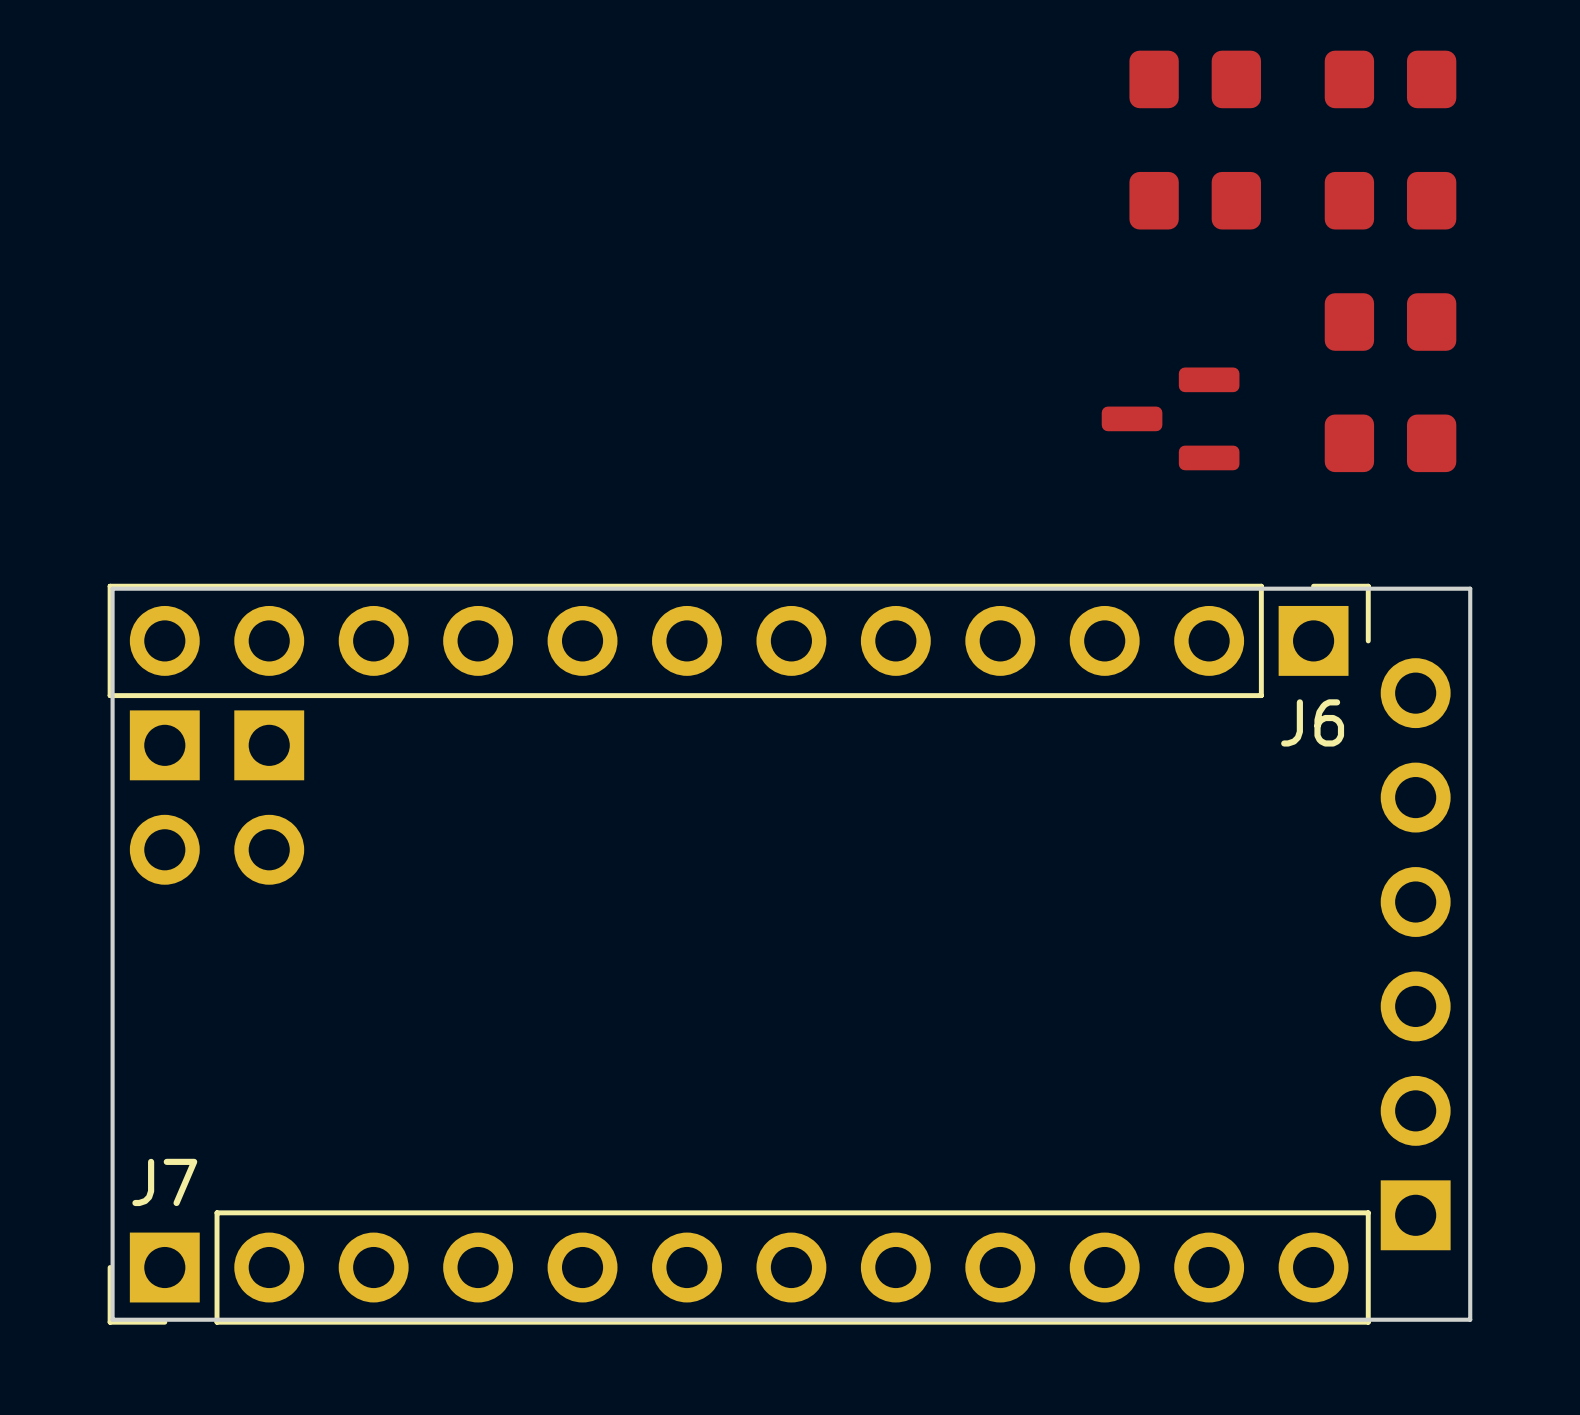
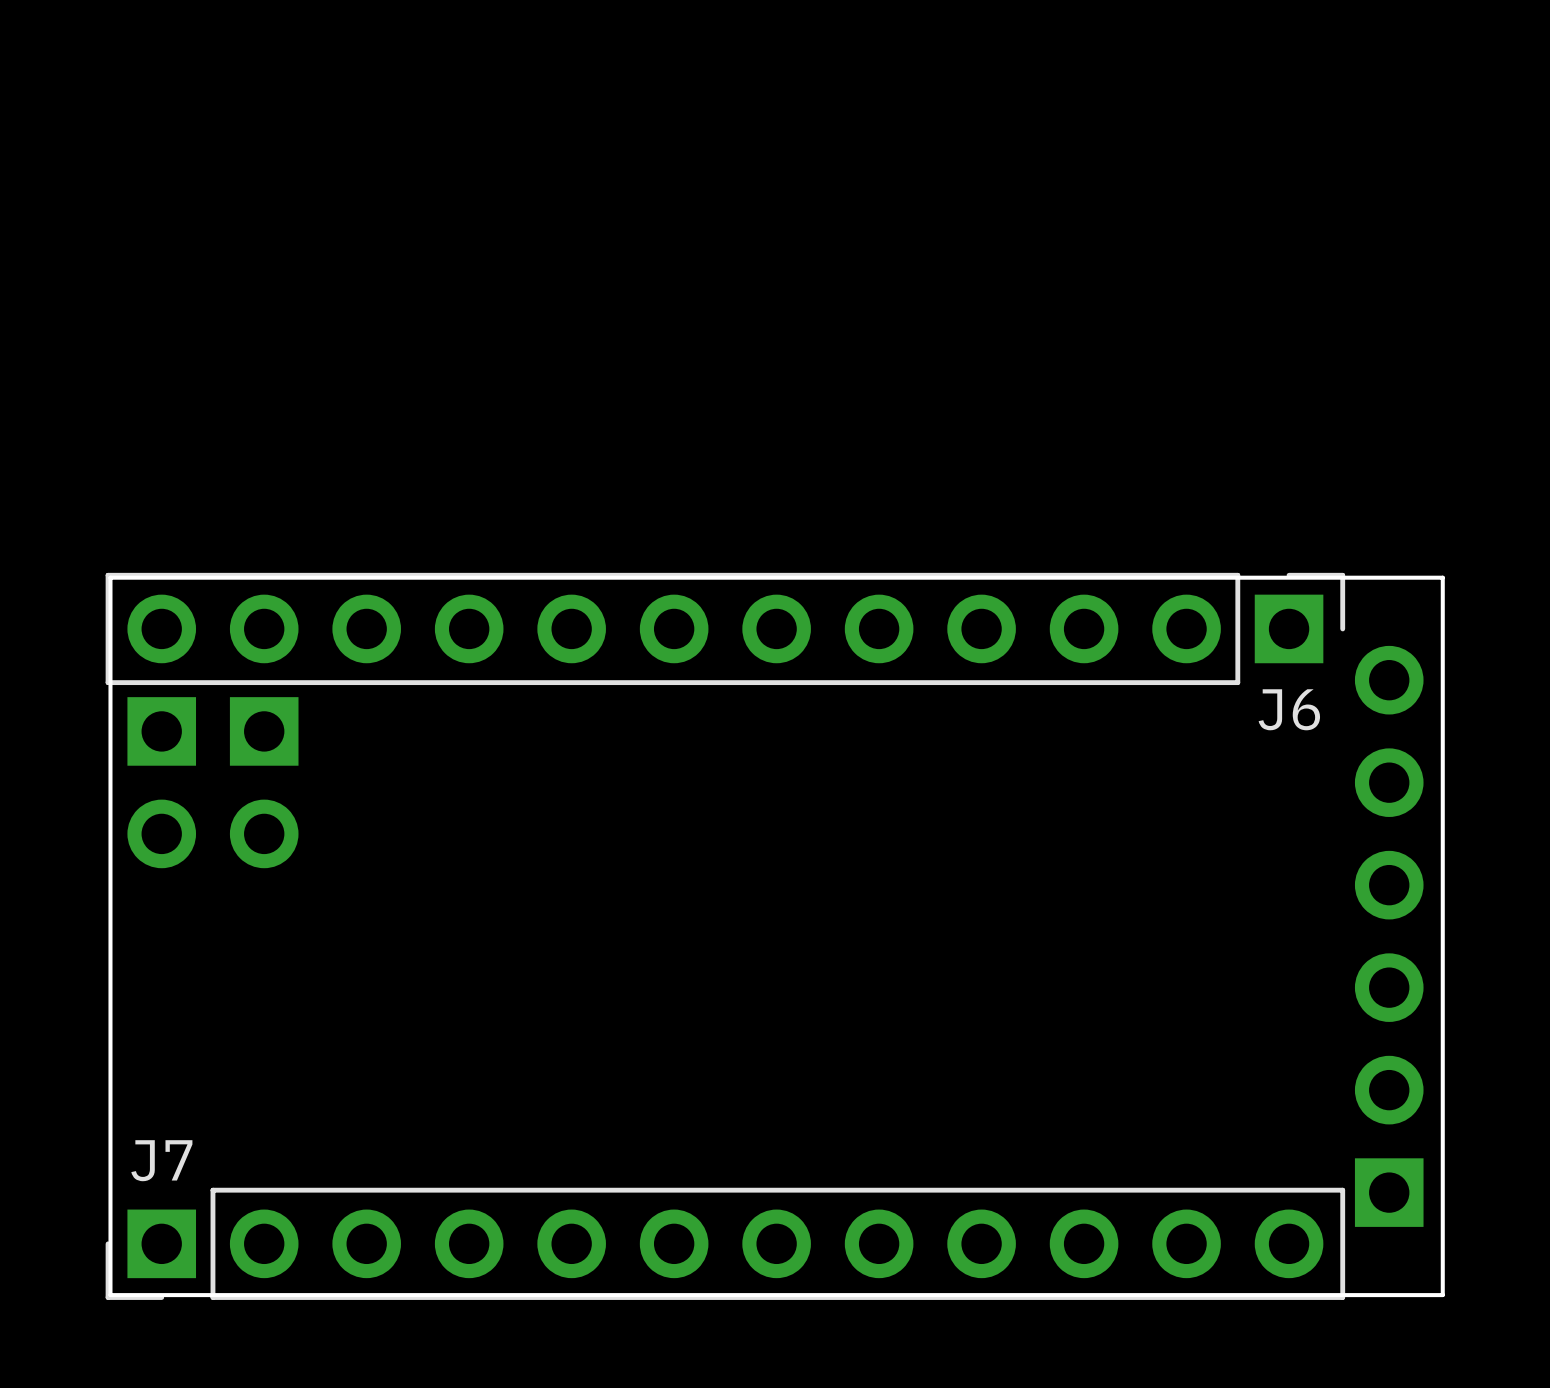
part: (1195, 79) -> none
part: (1390, 79) -> none
part: (1195, 200) -> none
part: (1390, 200) -> none
part: (1390, 322) -> none
part: (1170, 418) -> none
part: (1390, 443) -> none

